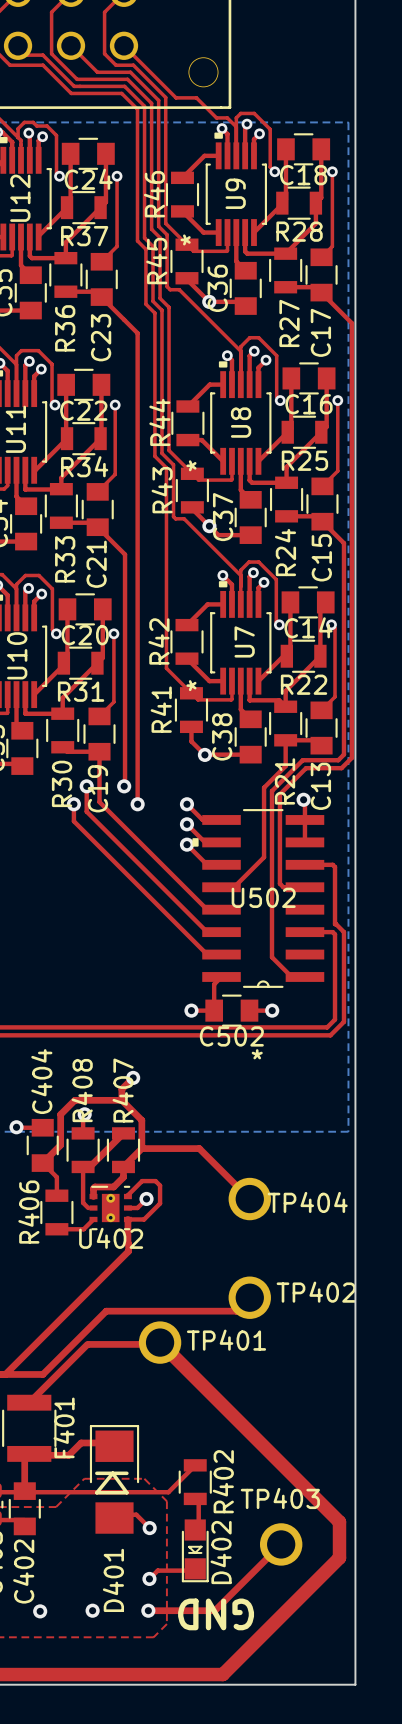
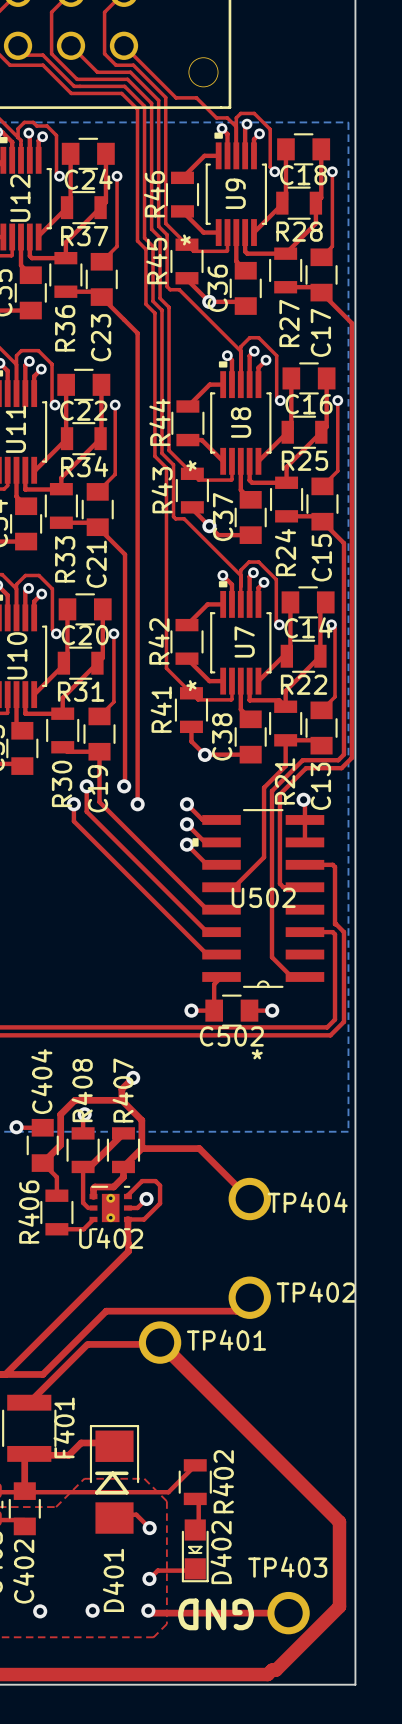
top track: (281, 1544) (214, 1610) (148, 1610) -> none
TP403 position: (281, 1544) -> (288, 1613)
top track: (339, 1557) (222, 1674) -> (339, 1557) (339, 1606) (276, 1670) (272, 1670) (267, 1674) (222, 1674)
top track: none -> (150, 1613) (288, 1613)

